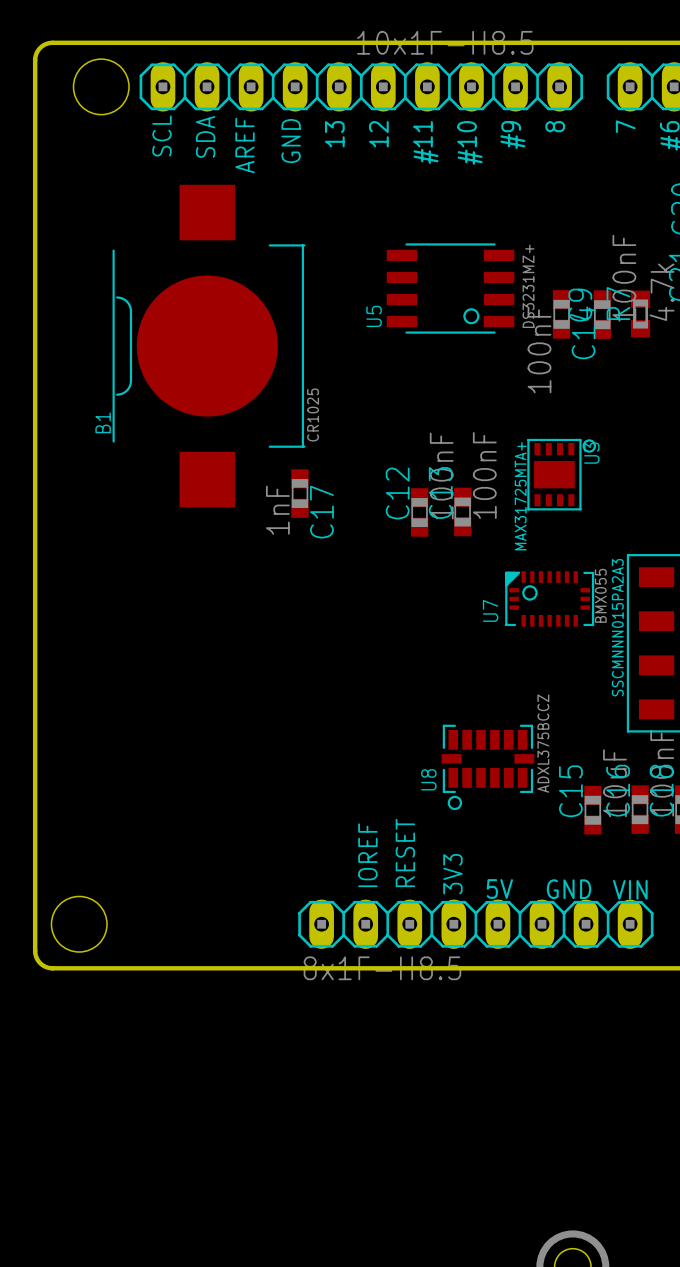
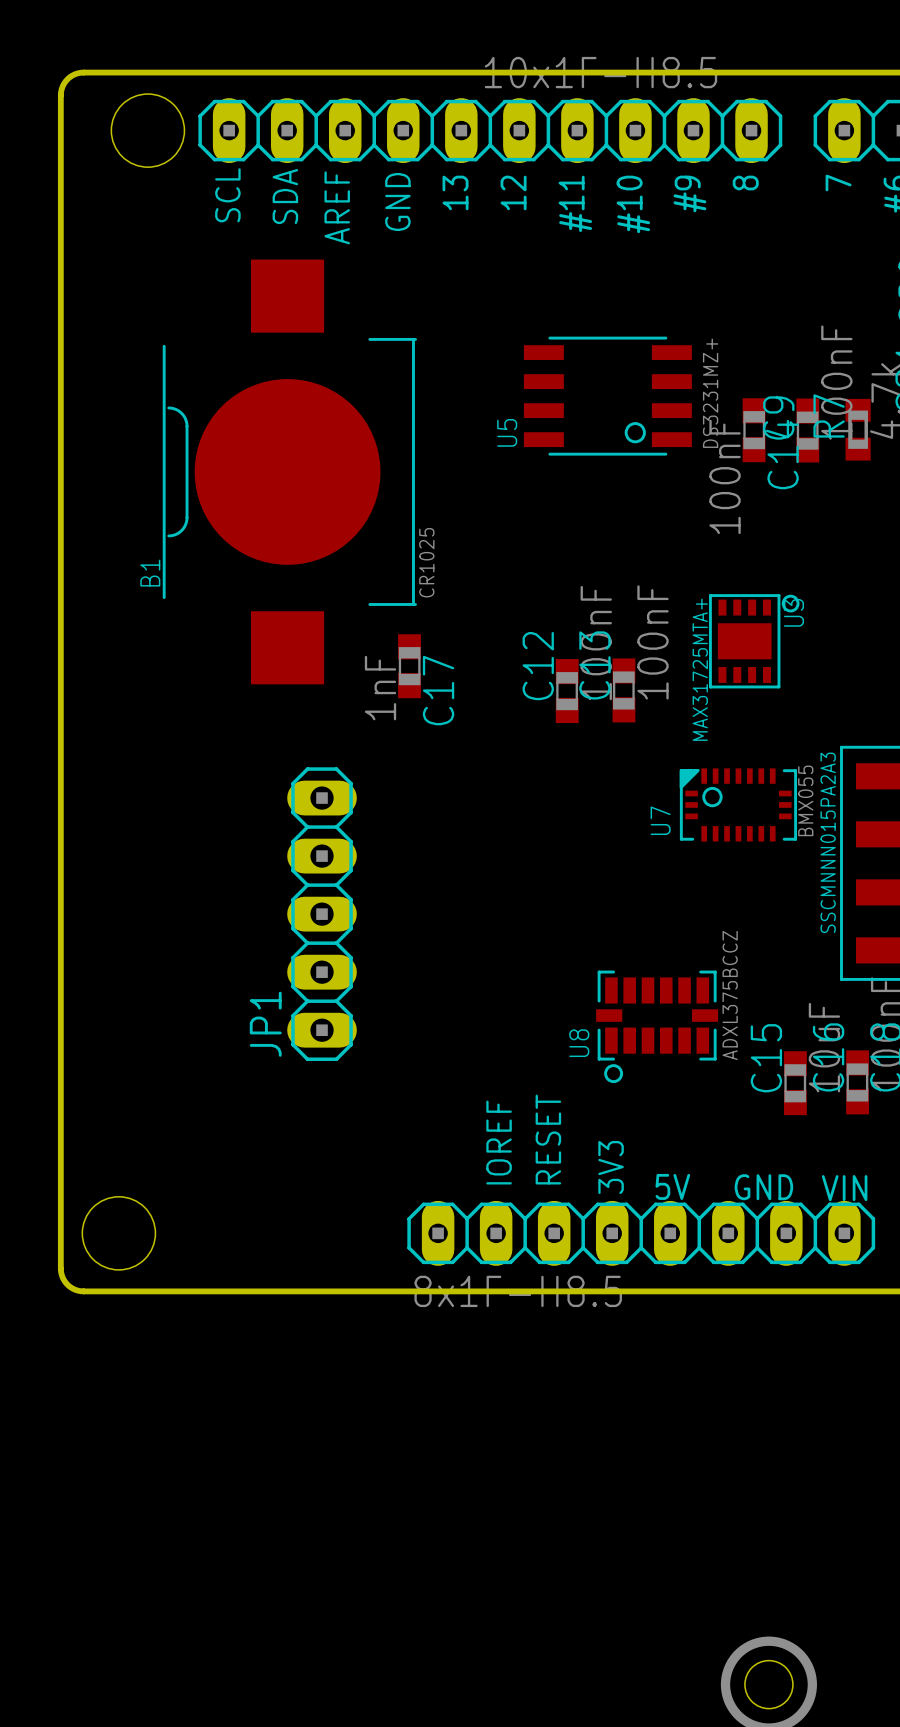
JP1: none -> (322, 914)

